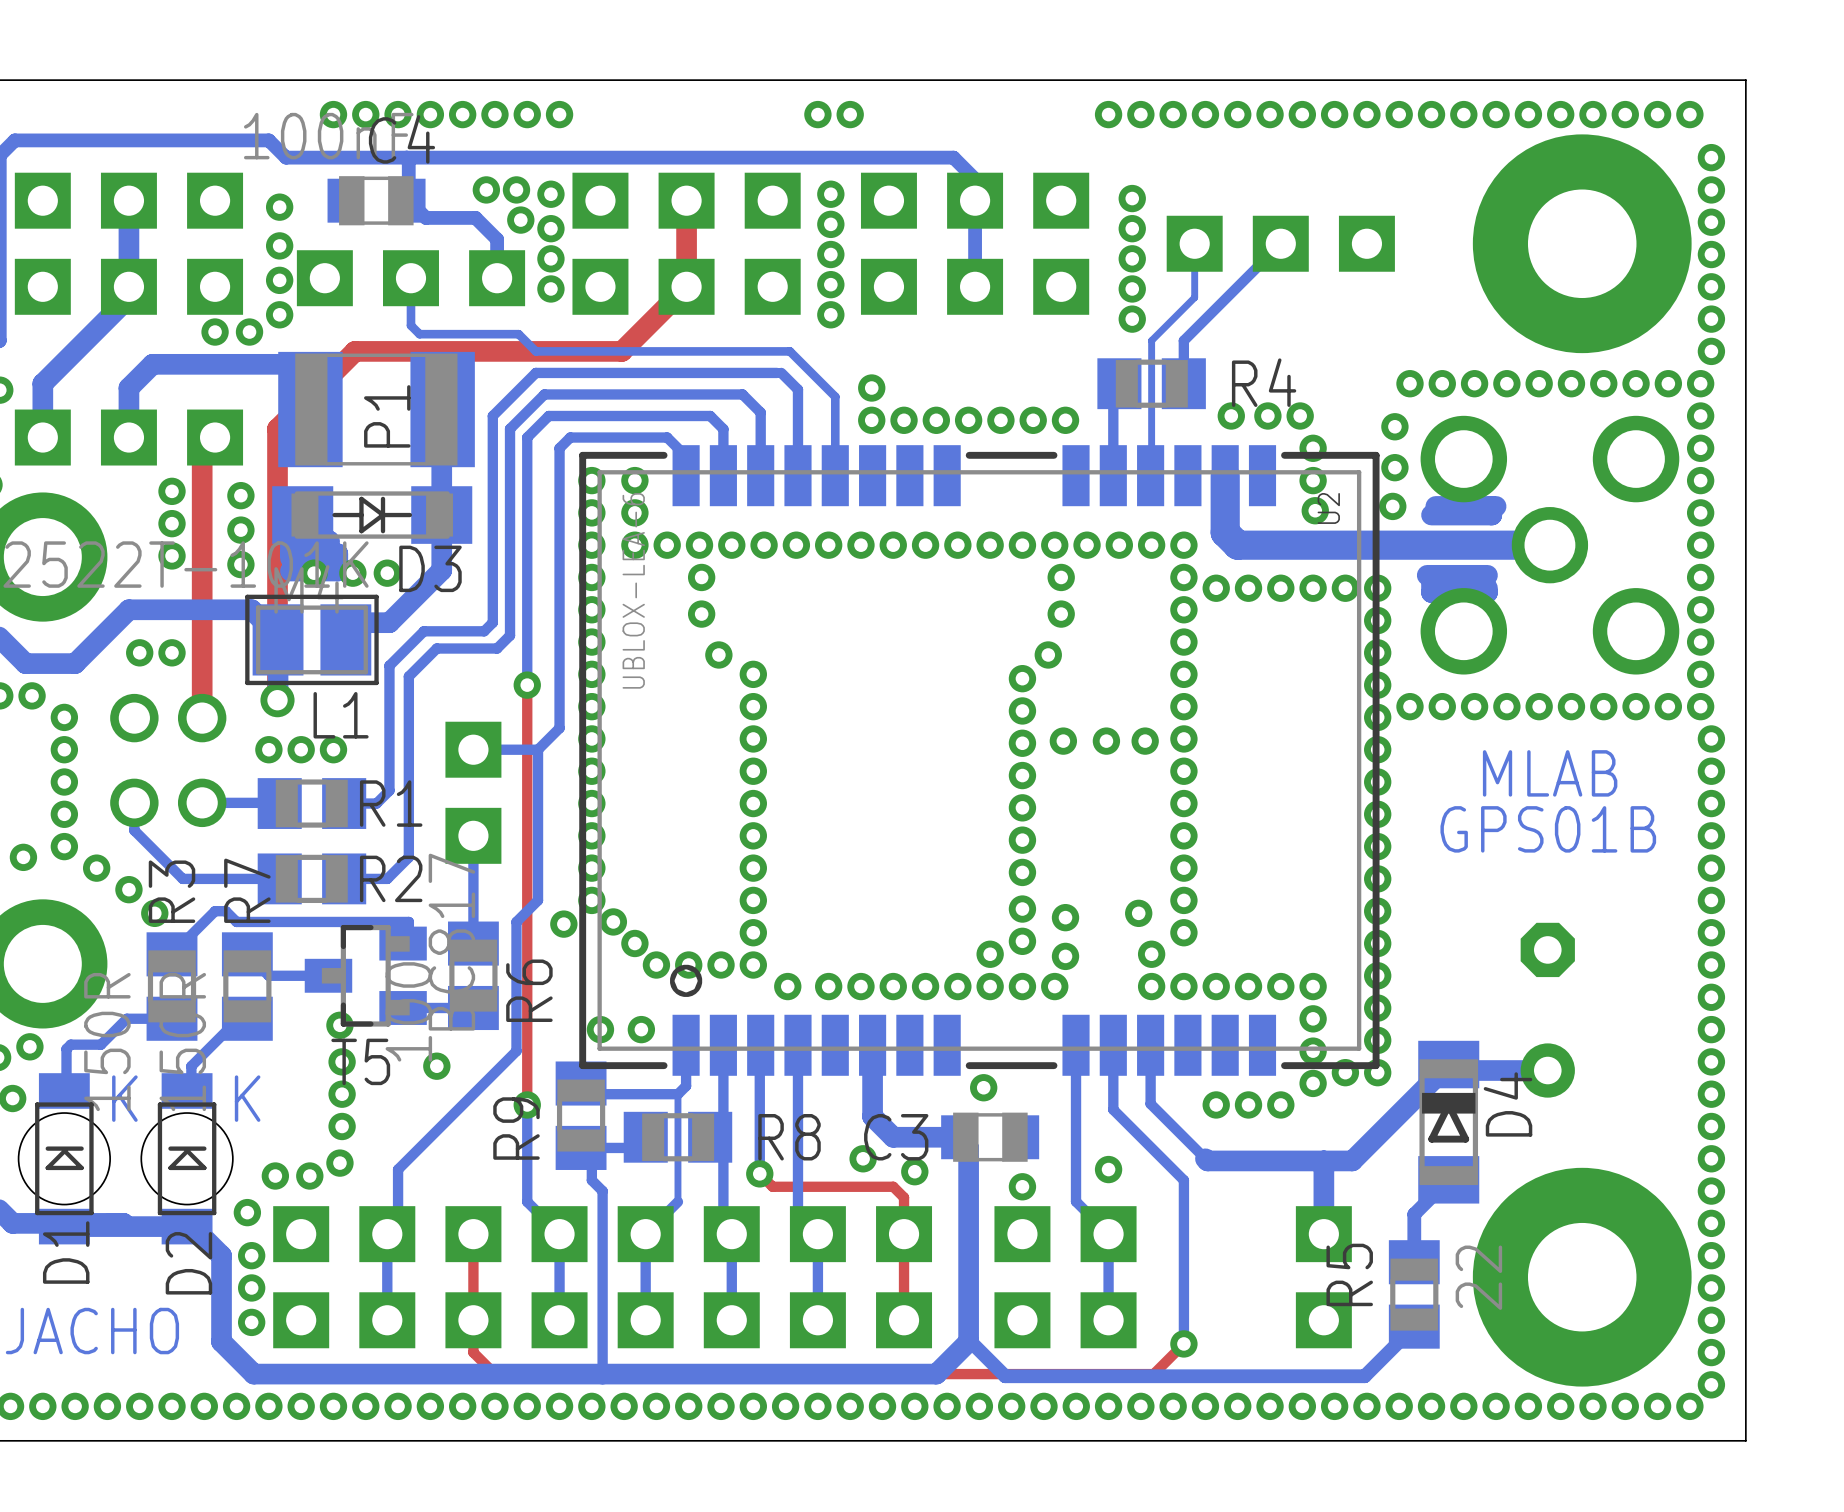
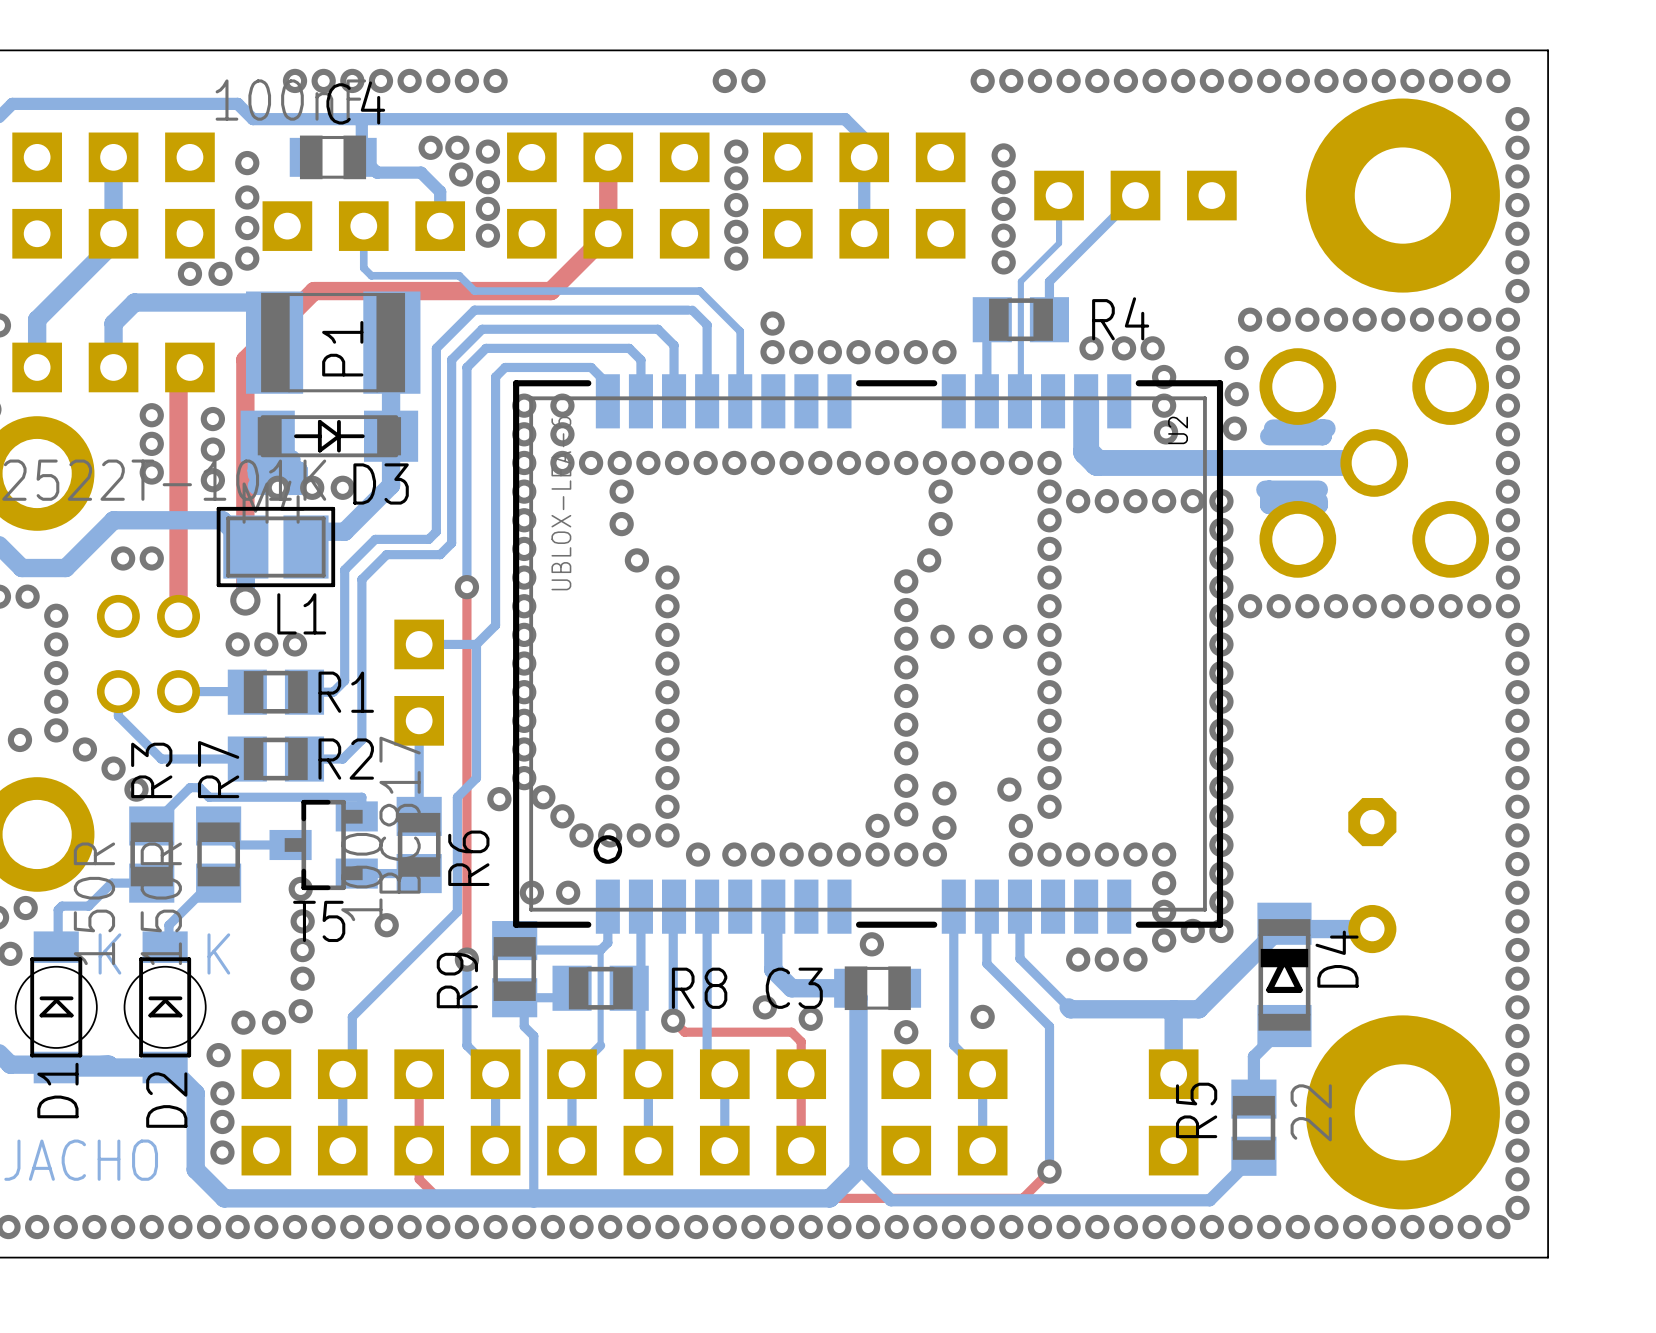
text: MLAB (1550, 773) -> none
text: GPS01B (1548, 829) -> none

